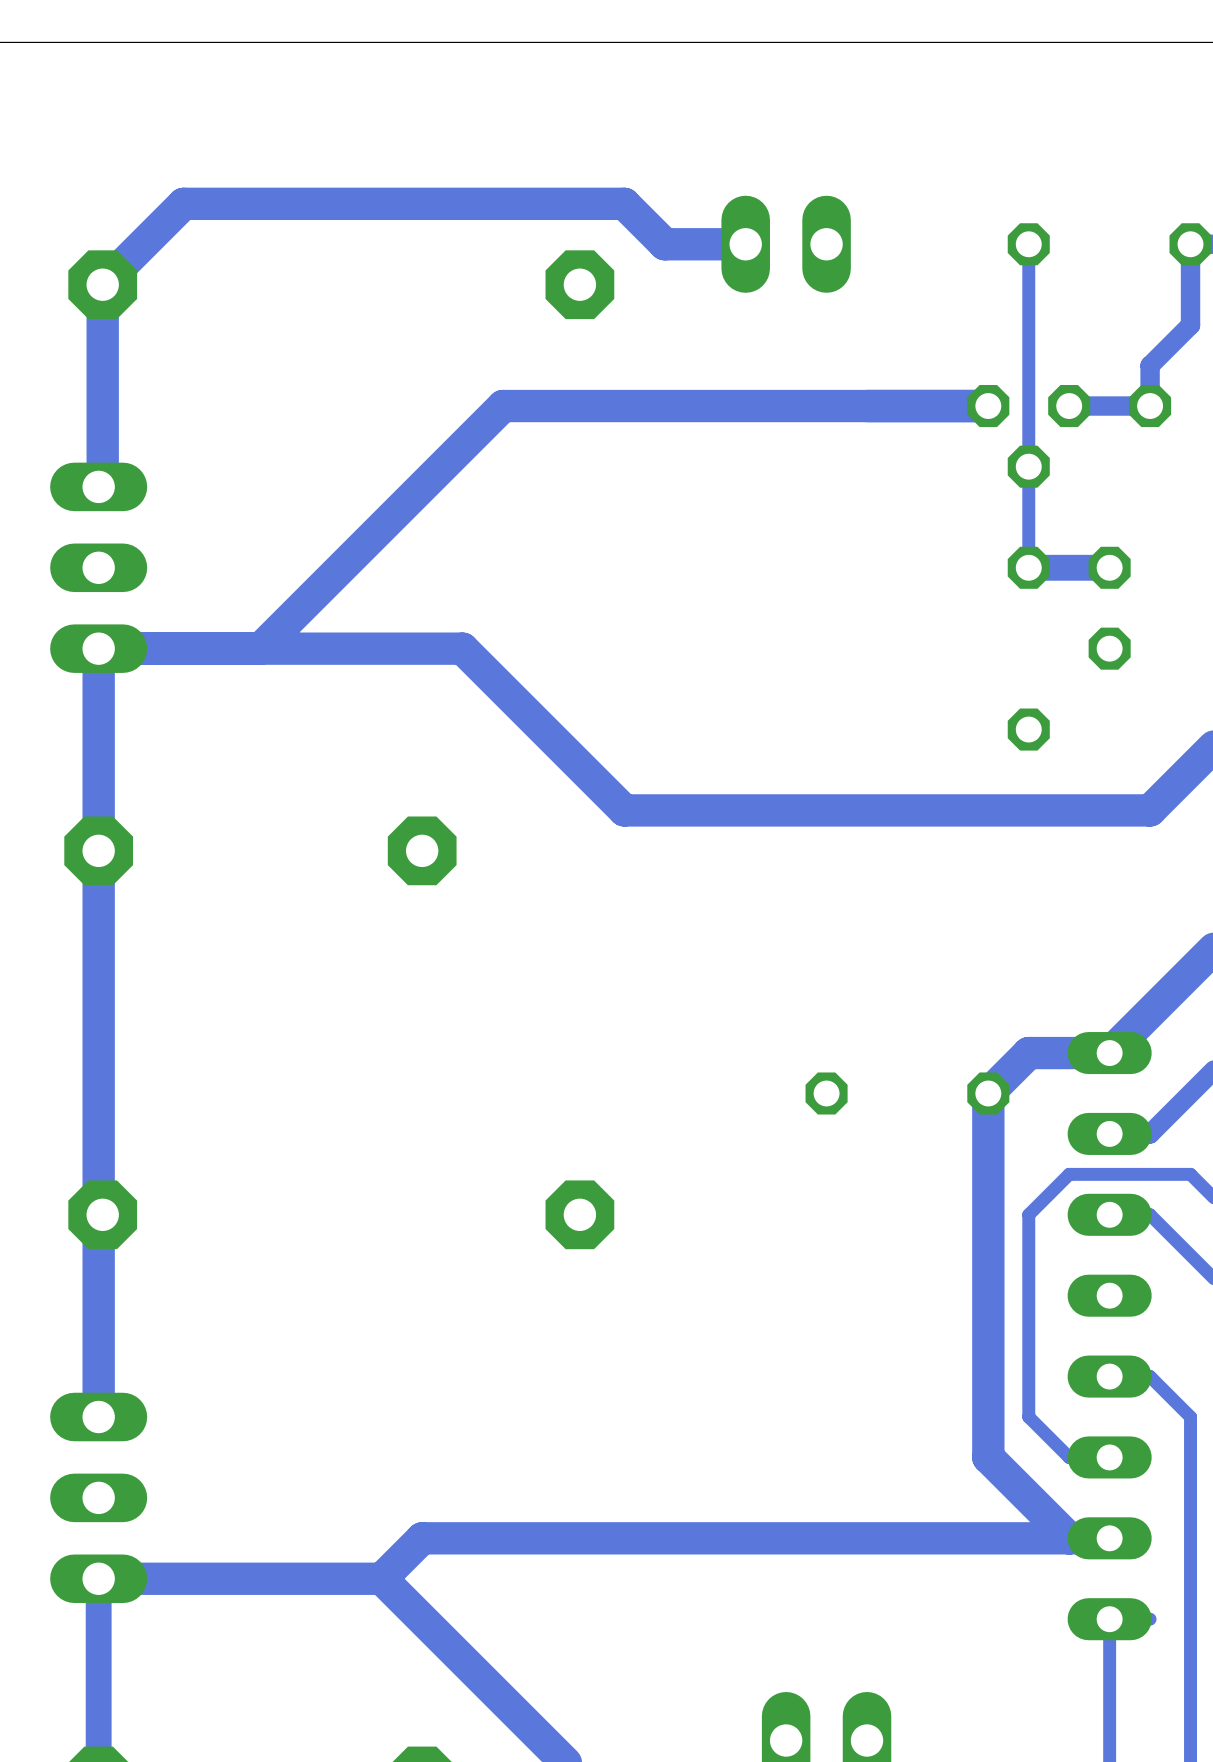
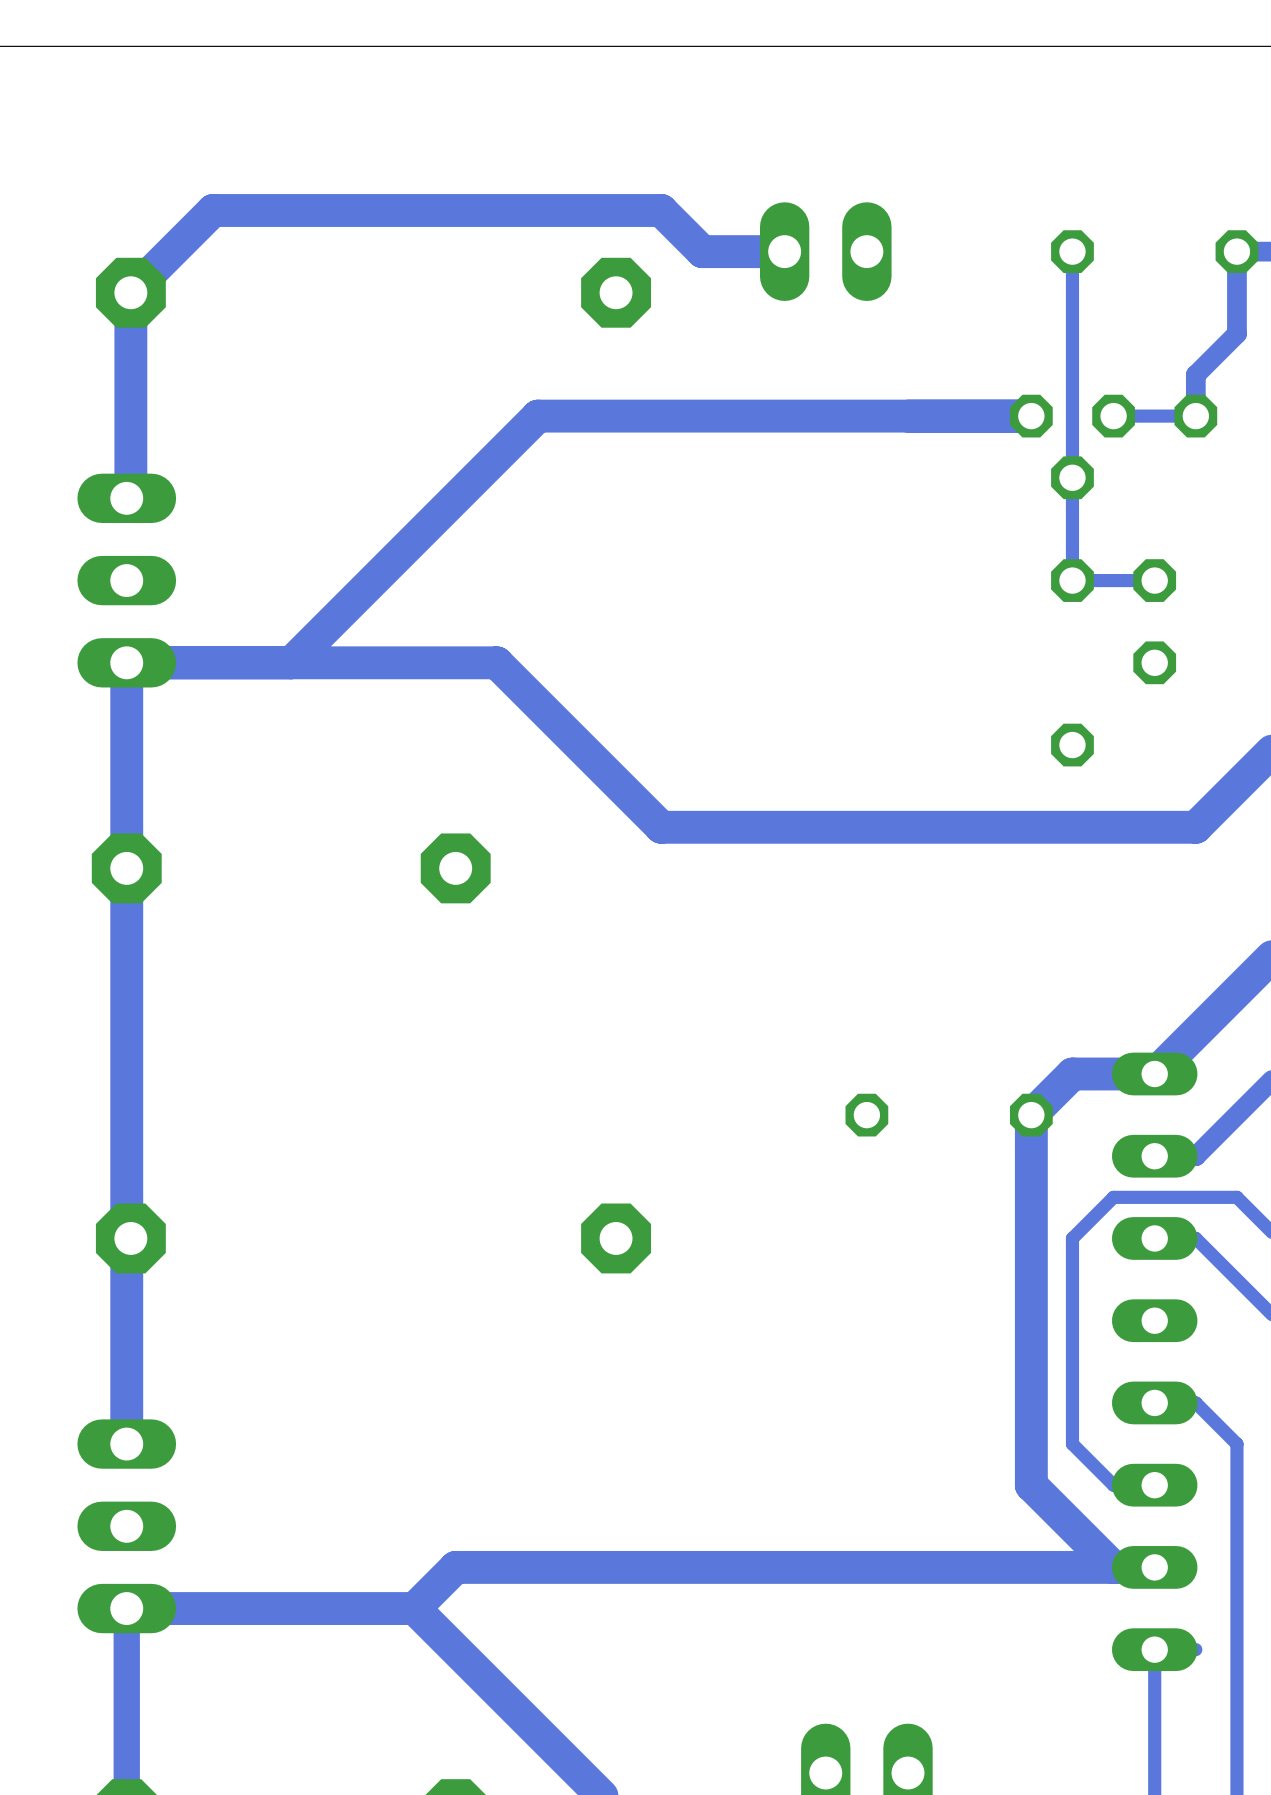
track width: thick (1150, 406) (1069, 406) -> thin (1195, 416) (1113, 416)
track width: thick (1109, 567) (1028, 567) -> thin (1154, 580) (1072, 580)

